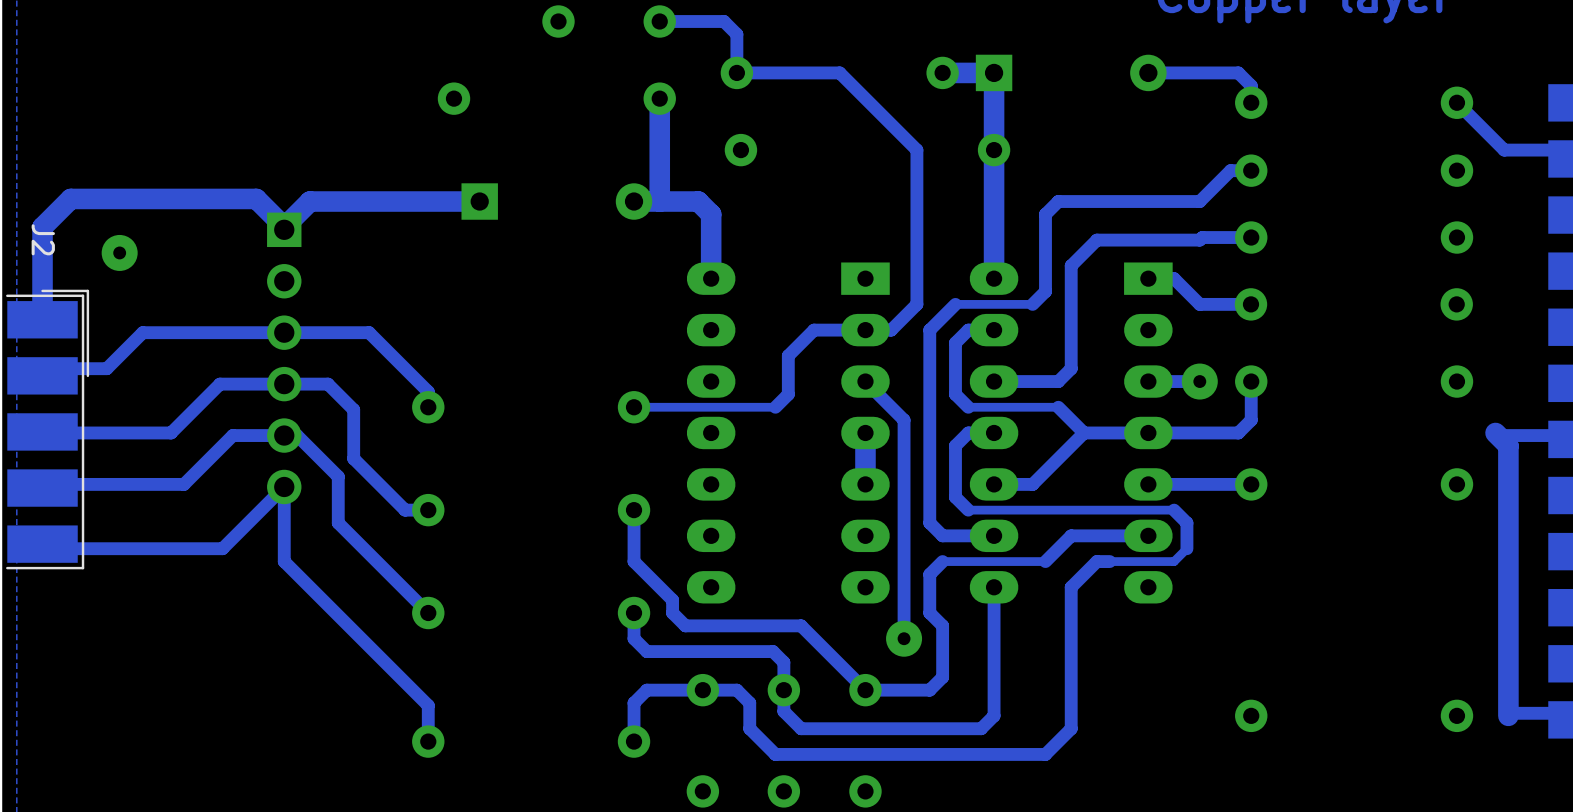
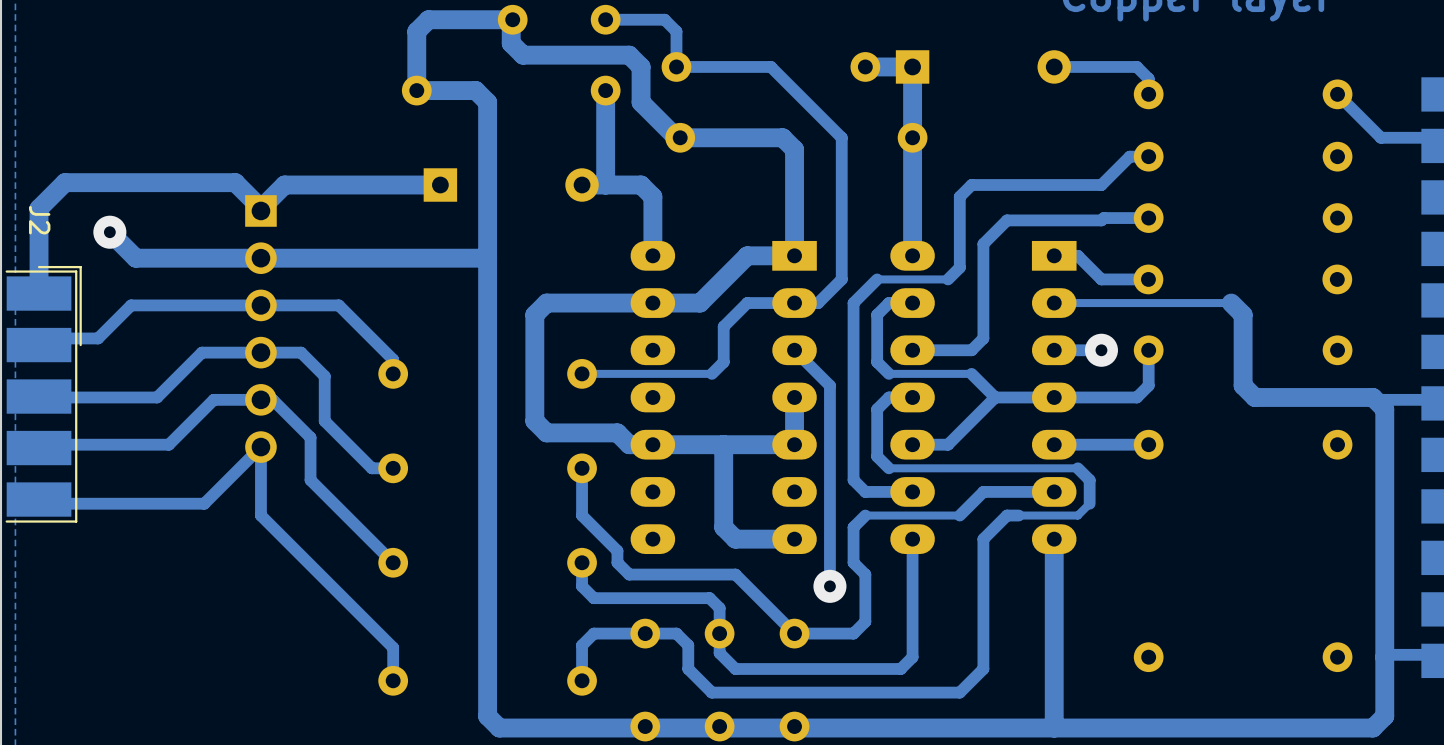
track: none -> (109, 232) (135, 258) (487, 258)
track: none -> (1054, 303) (1231, 303) (1243, 314) (1243, 385) (1254, 397) (1372, 397)
track: none -> (723, 444) (723, 527) (735, 539) (794, 539)
track: none -> (794, 444) (629, 444) (617, 432) (546, 432) (534, 421) (534, 314) (546, 303) (700, 303) (747, 255) (794, 255) (794, 149) (782, 137) (676, 137) (641, 102) (641, 66) (629, 55) (523, 55) (511, 43) (511, 19) (428, 19) (416, 31) (416, 90) (475, 90) (487, 102) (487, 716) (499, 728) (1372, 728) (1384, 716) (1384, 657)
track: none -> (1054, 539) (1054, 728)

